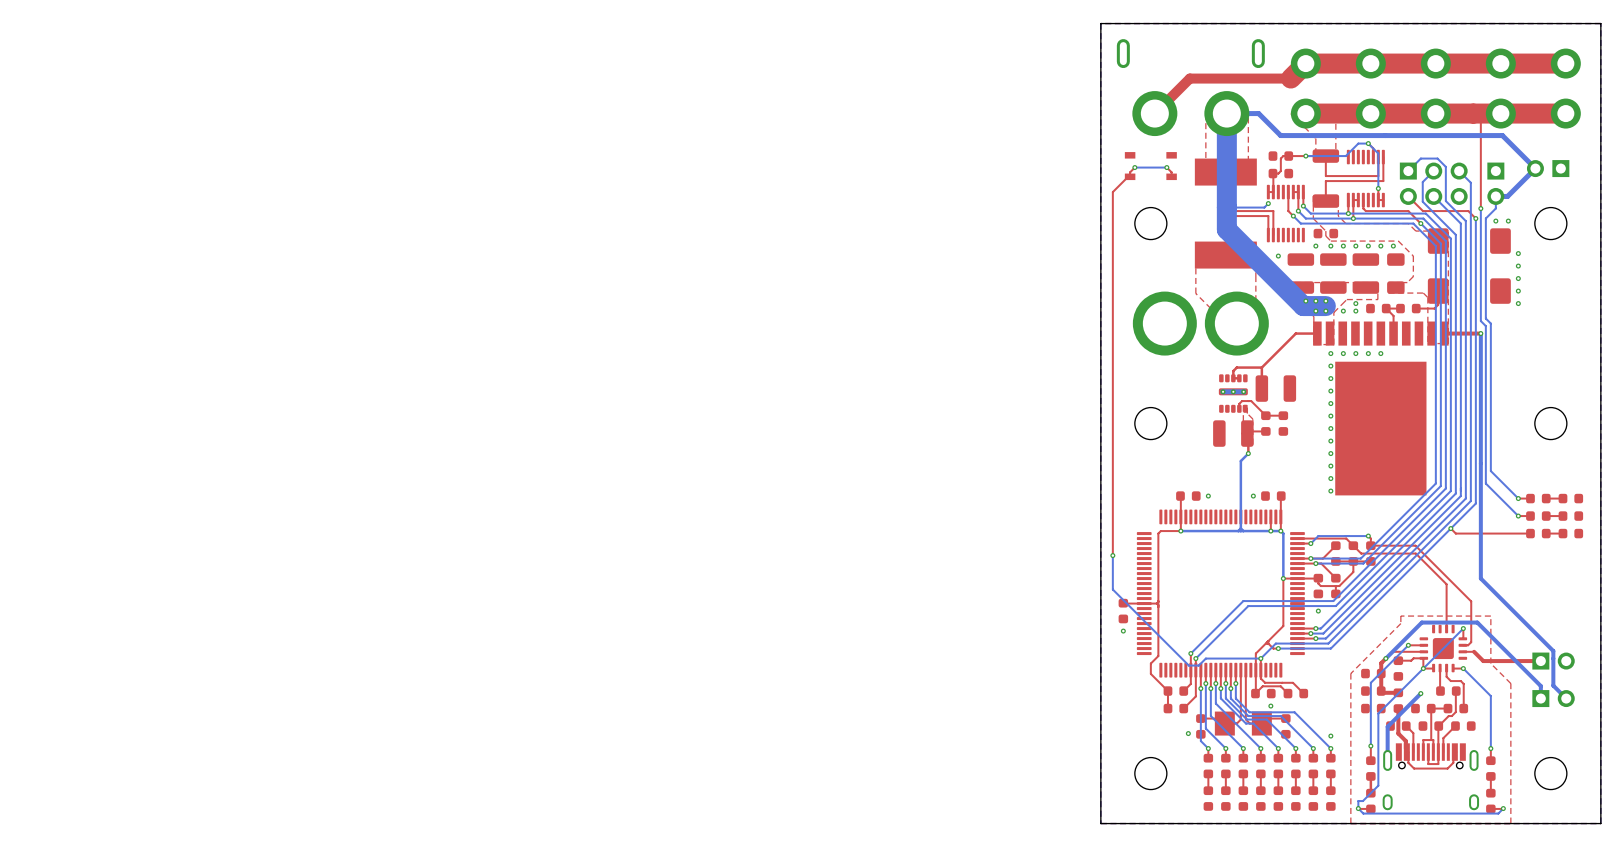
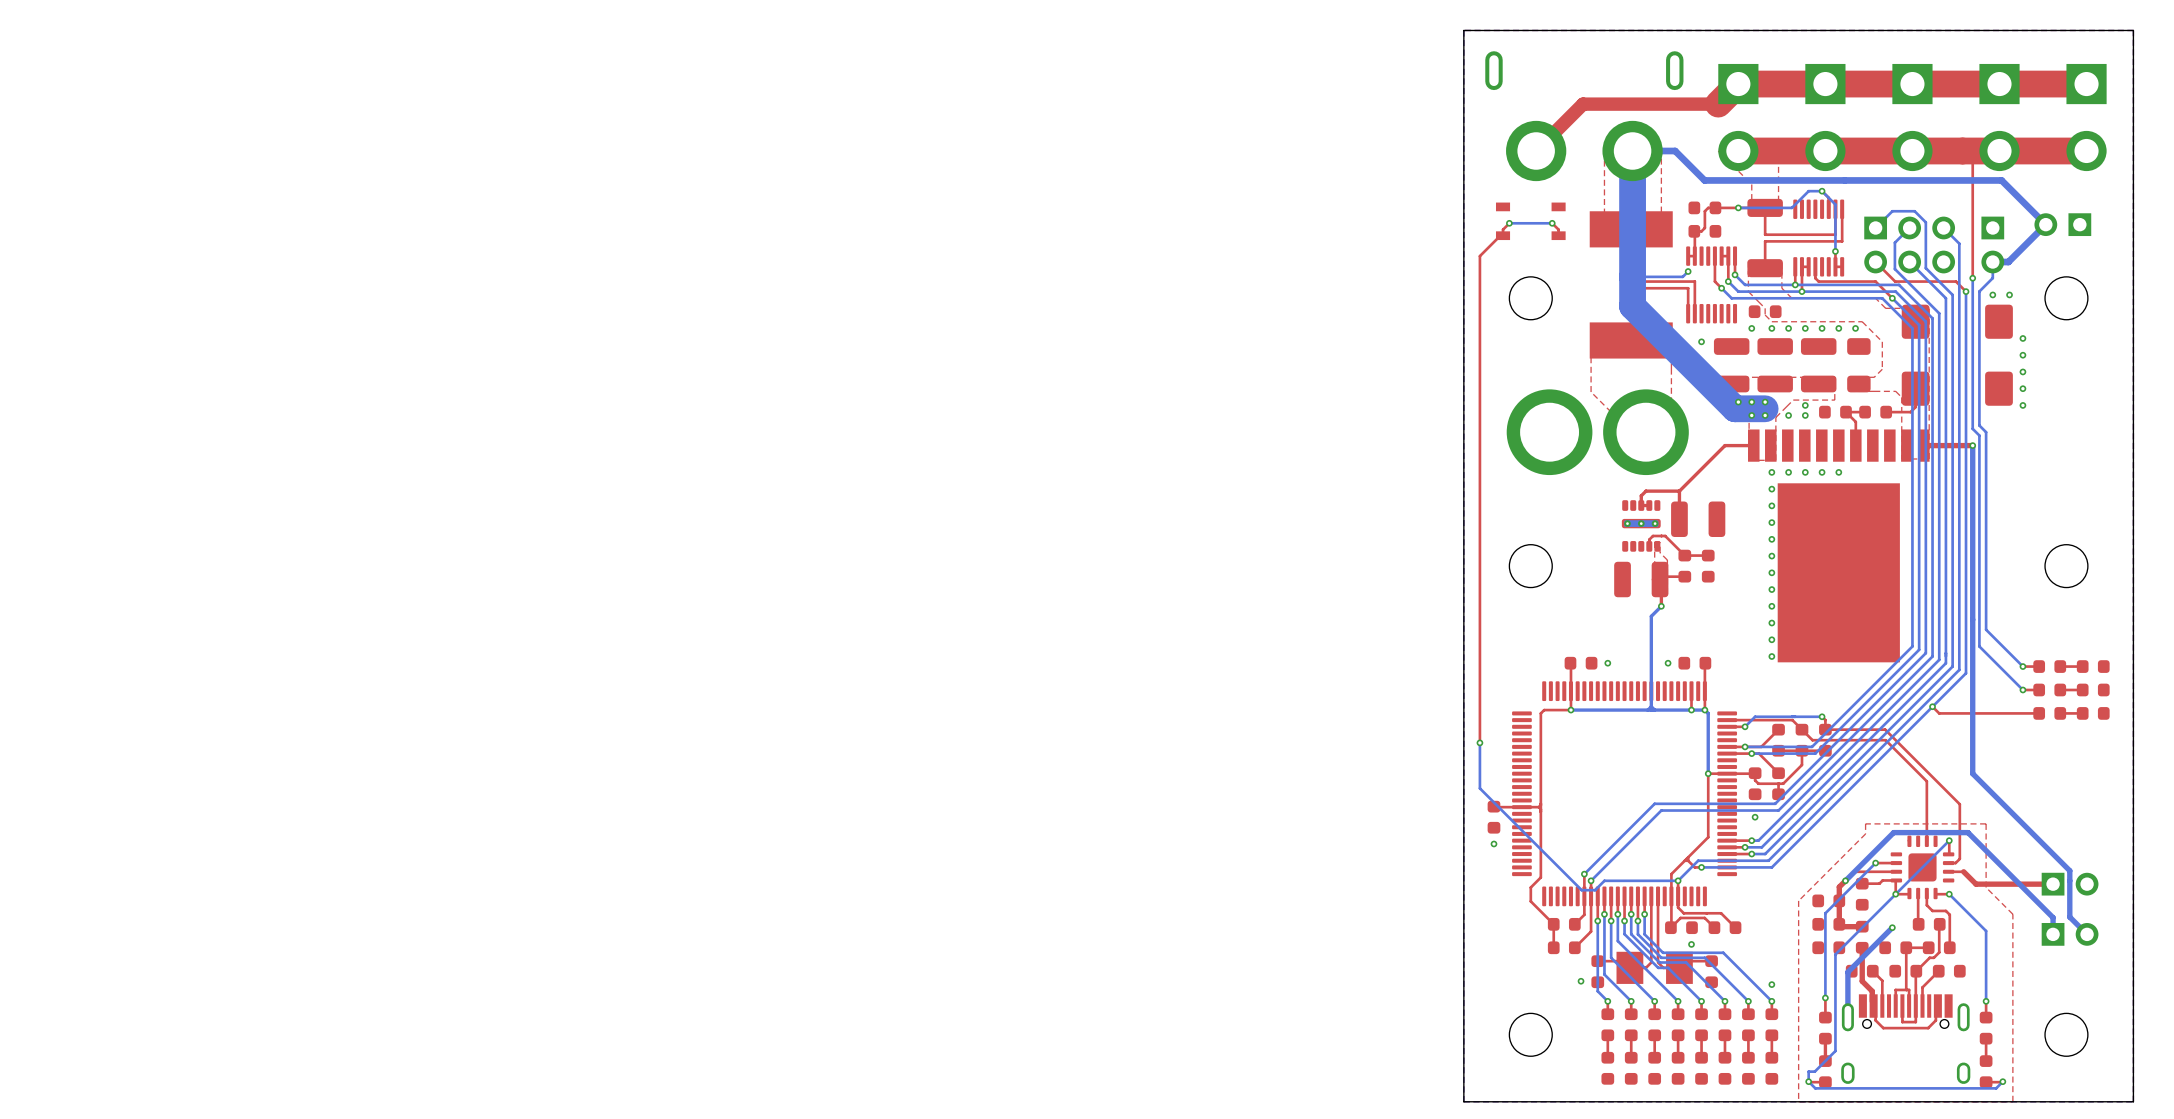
part footprint: [1290, 48, 1321, 129] -> [1718, 63, 1759, 172]
part footprint: [1355, 48, 1386, 129] -> [1805, 63, 1846, 172]
part footprint: [1420, 48, 1451, 129] -> [1892, 63, 1933, 172]
part footprint: [1485, 48, 1516, 129] -> [1979, 63, 2020, 172]
part footprint: [1550, 48, 1581, 129] -> [2066, 63, 2107, 172]

